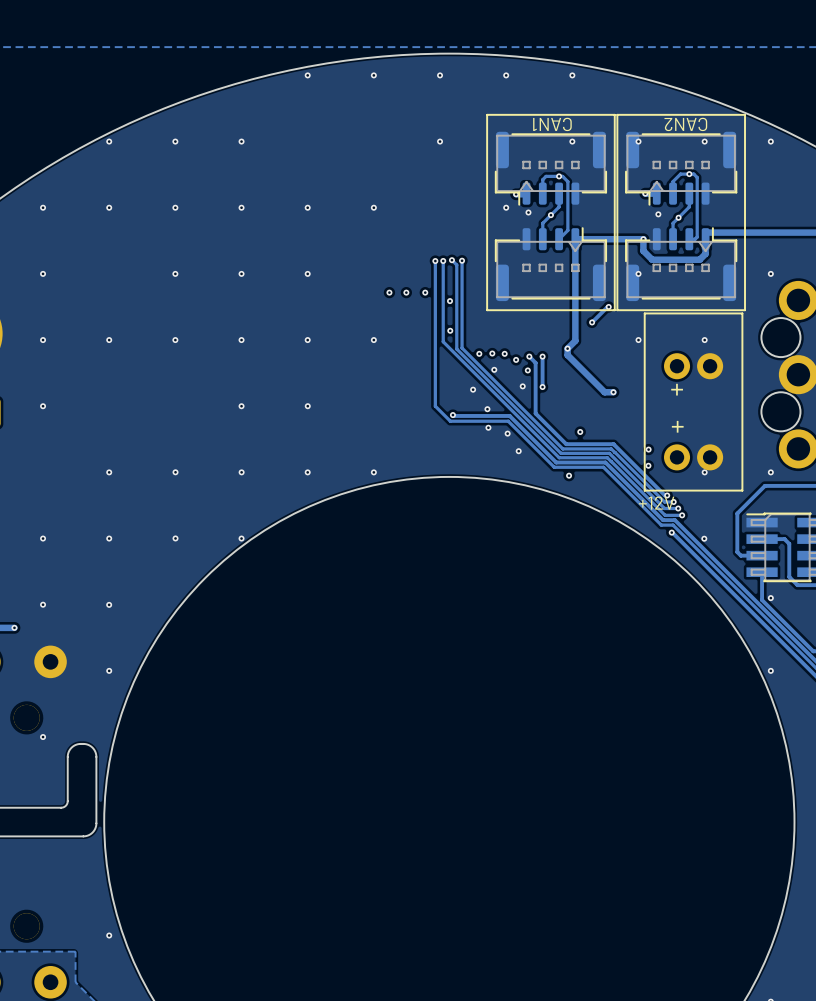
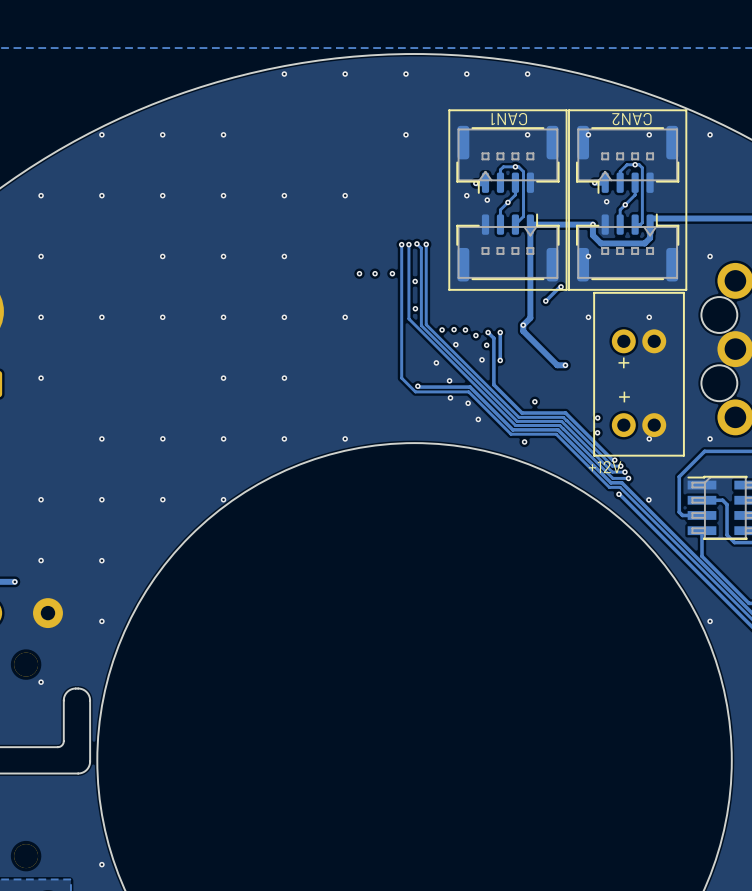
via: (770, 598) -> none

